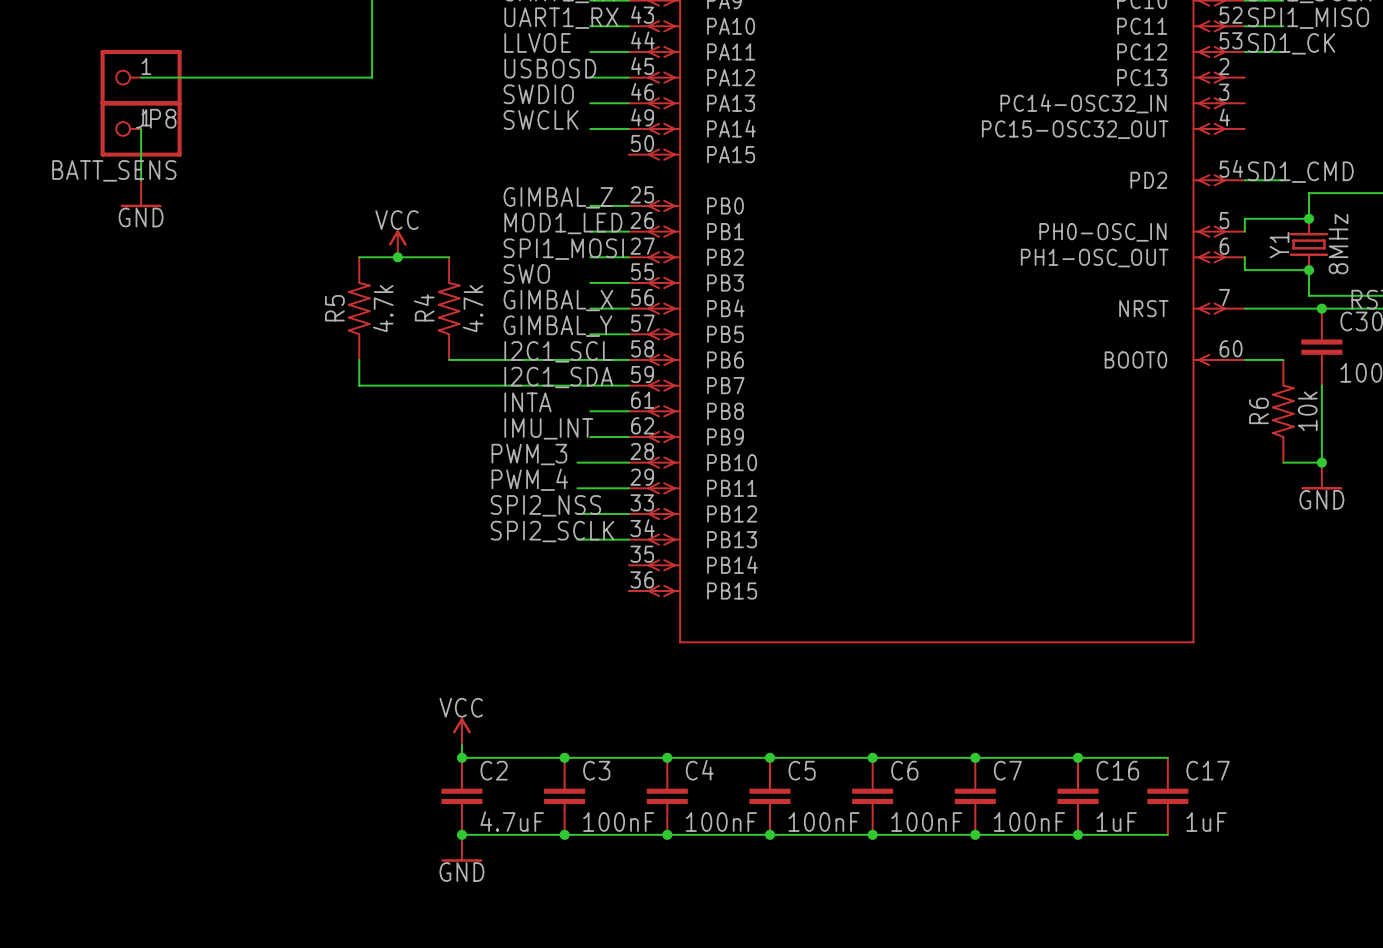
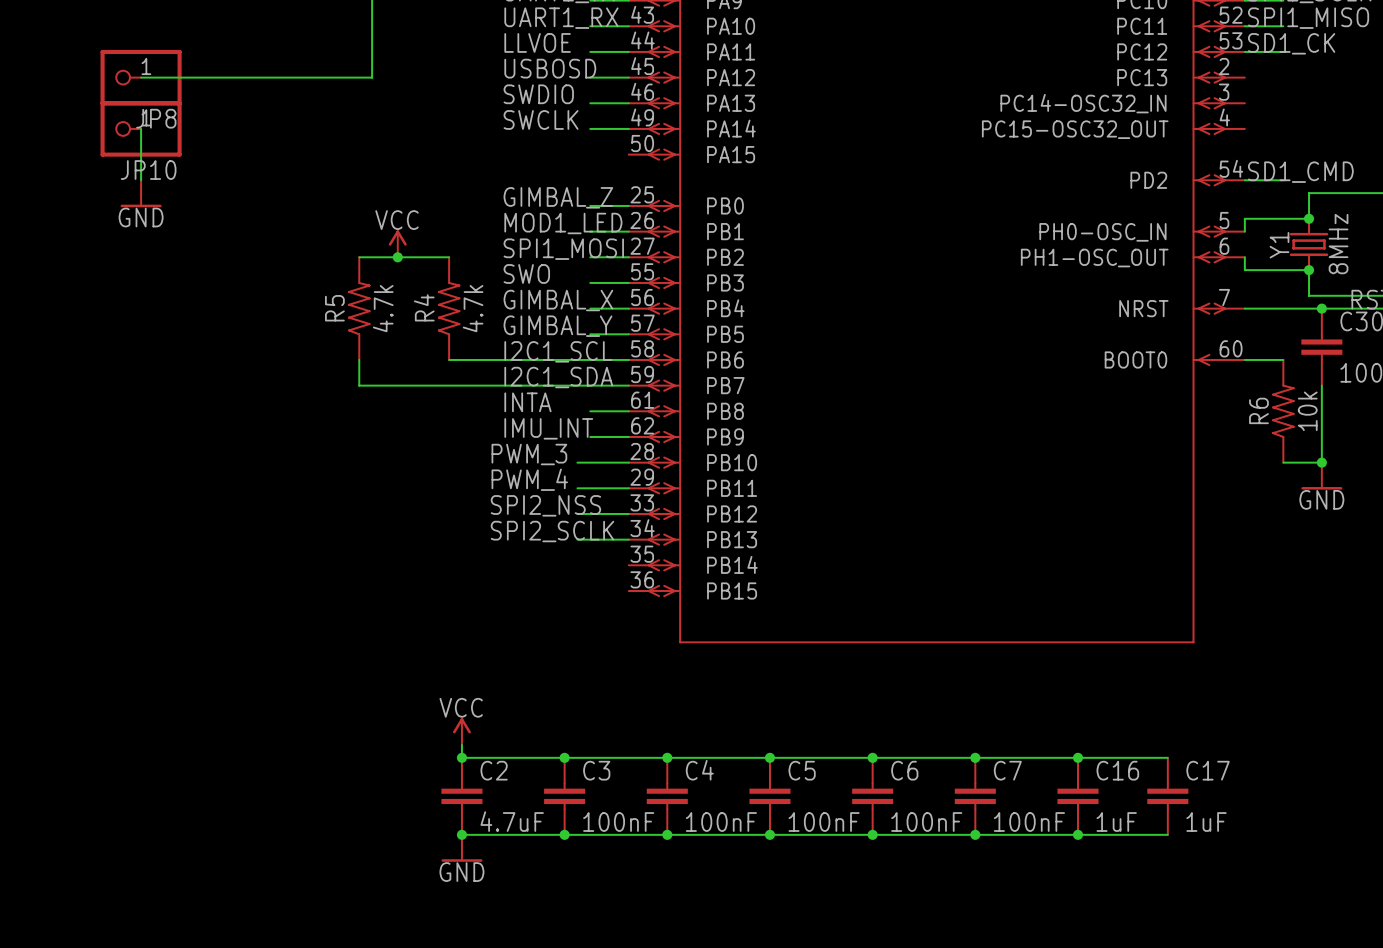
BATT_SENS name: BATT_SENS (114, 170) -> JP10 (148, 170)

